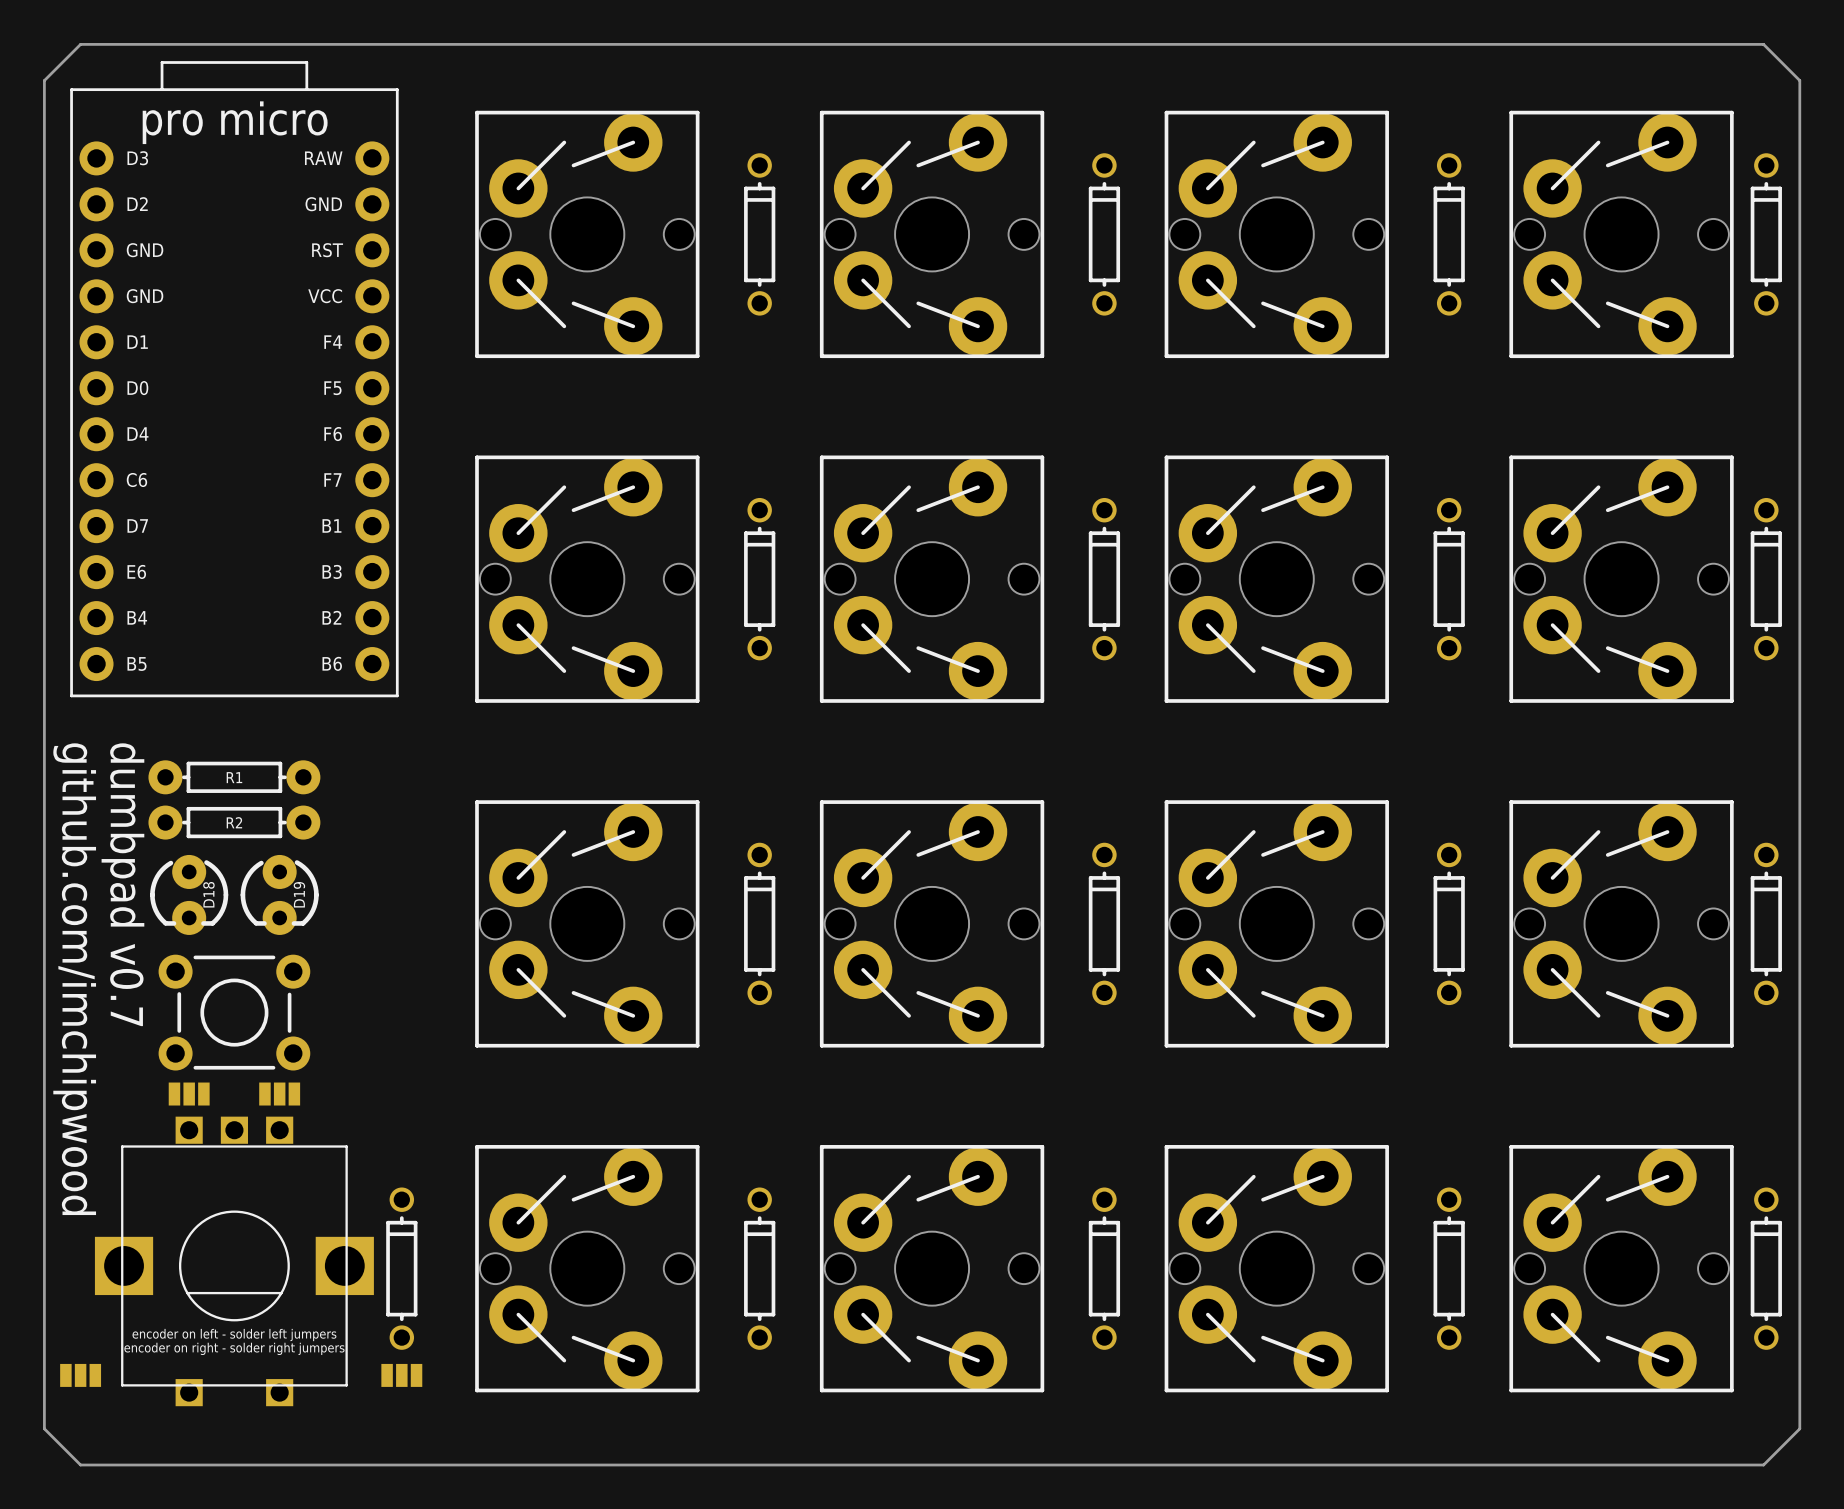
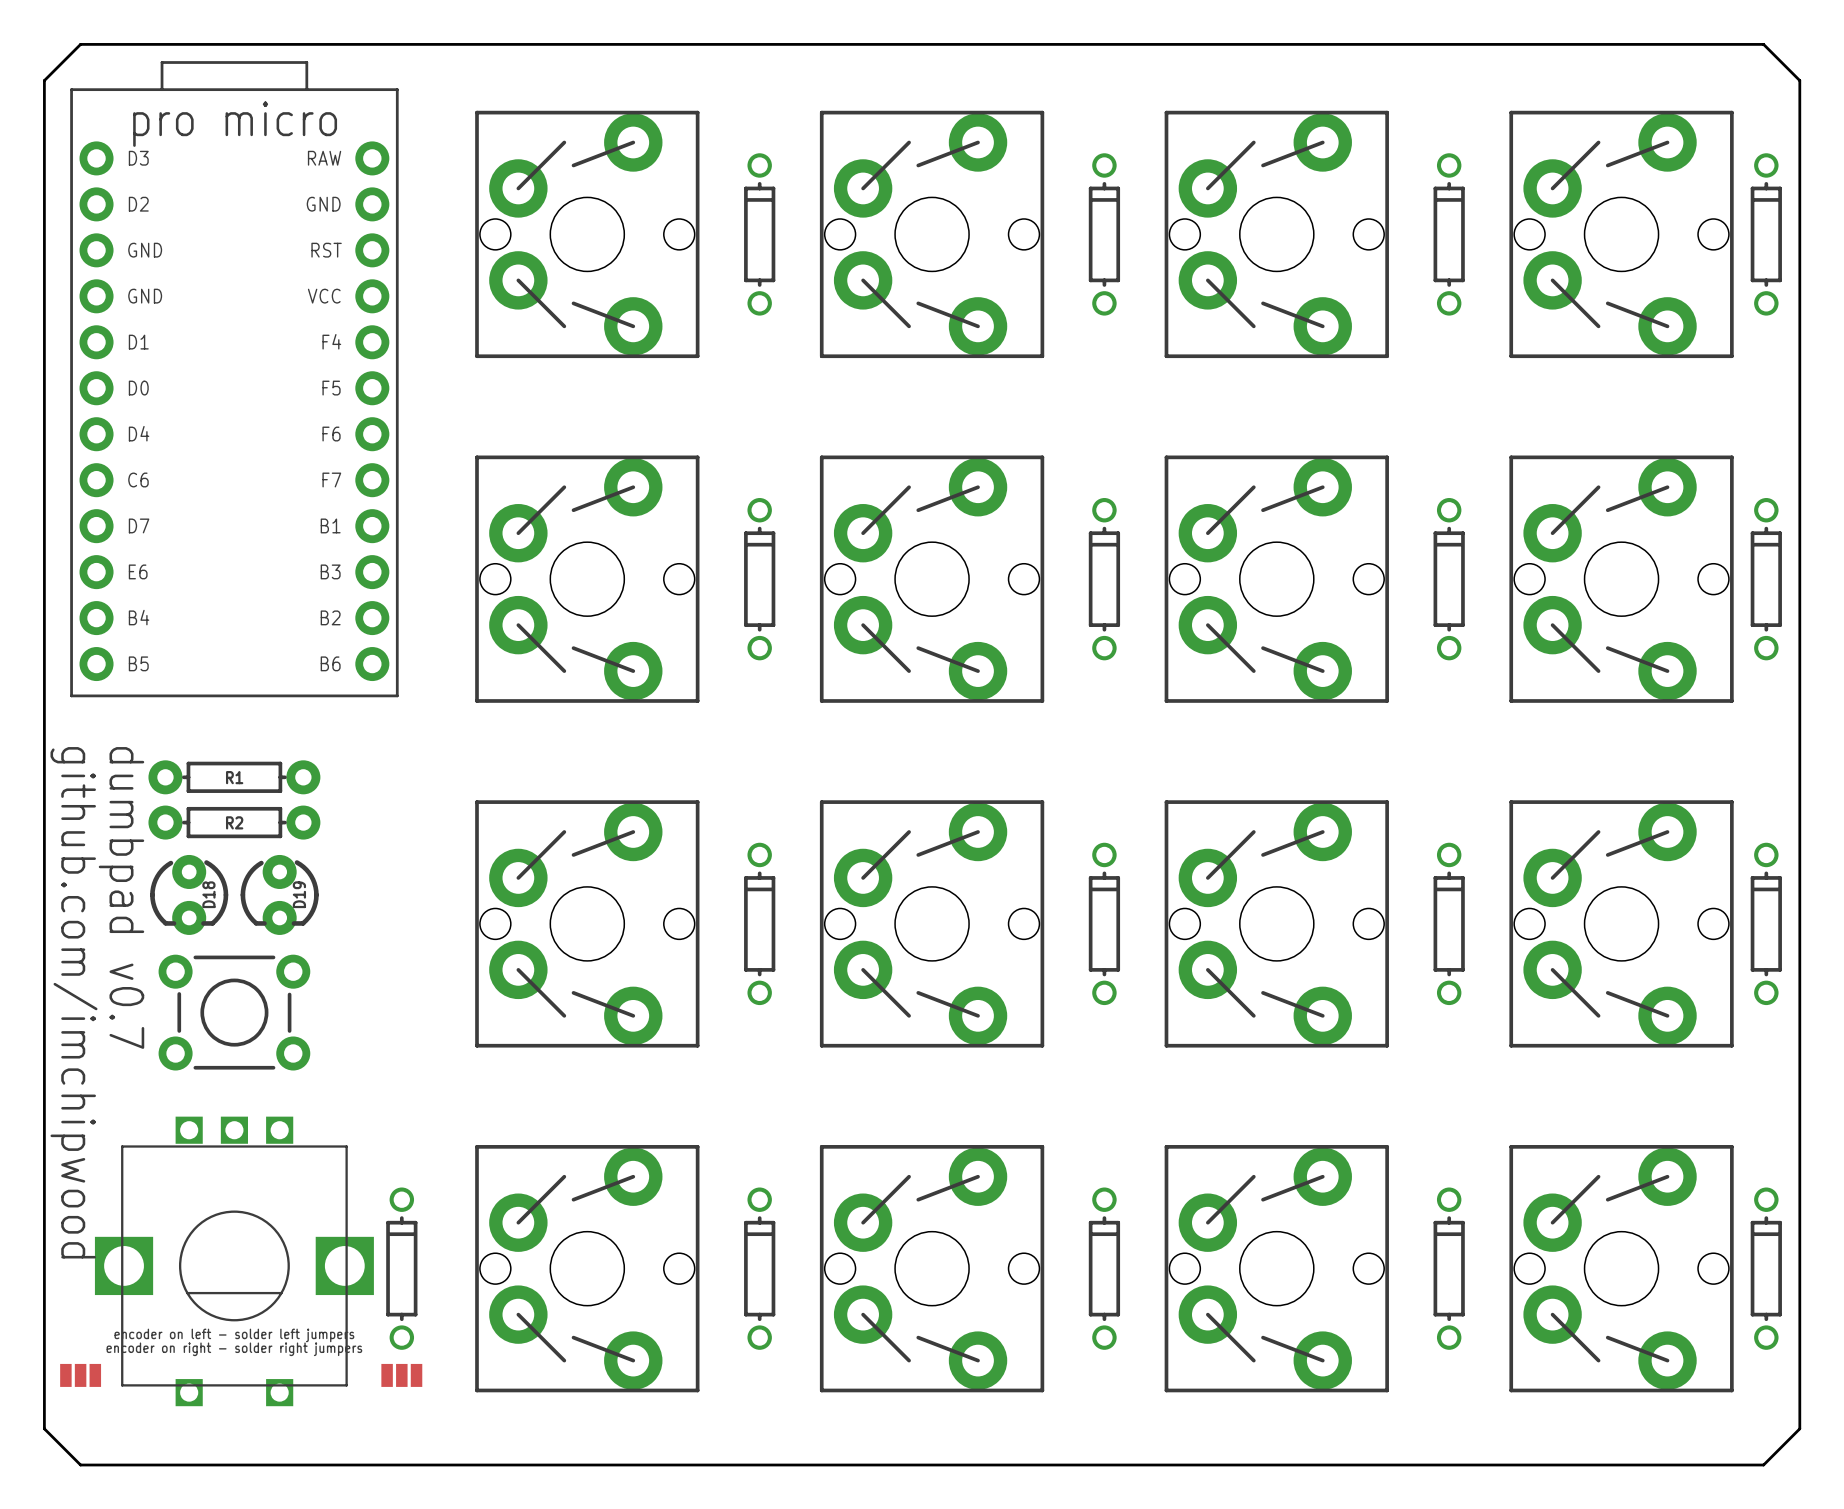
part: (189, 1094) -> none
part: (279, 1094) -> none

